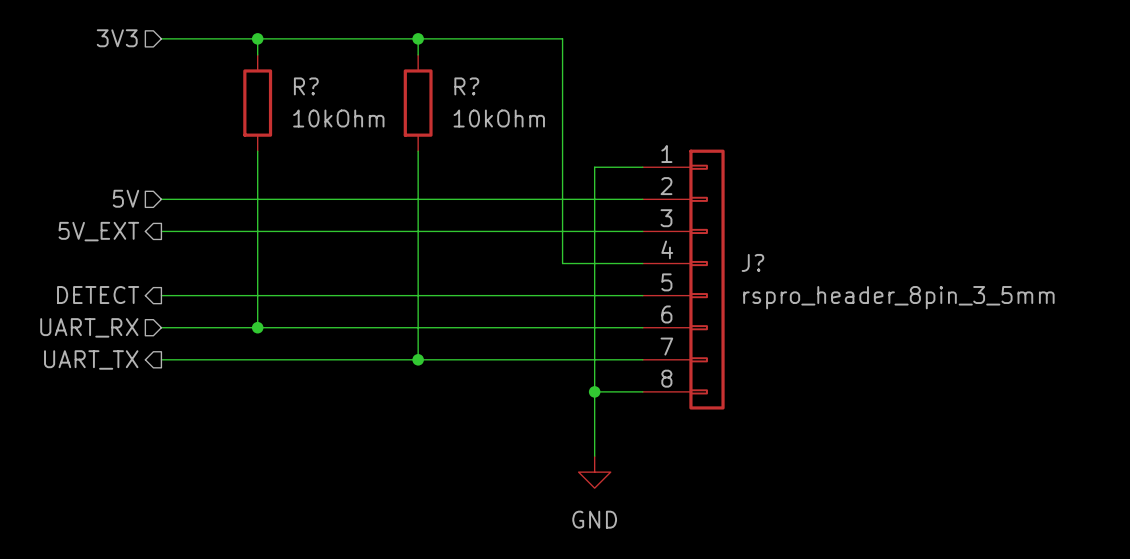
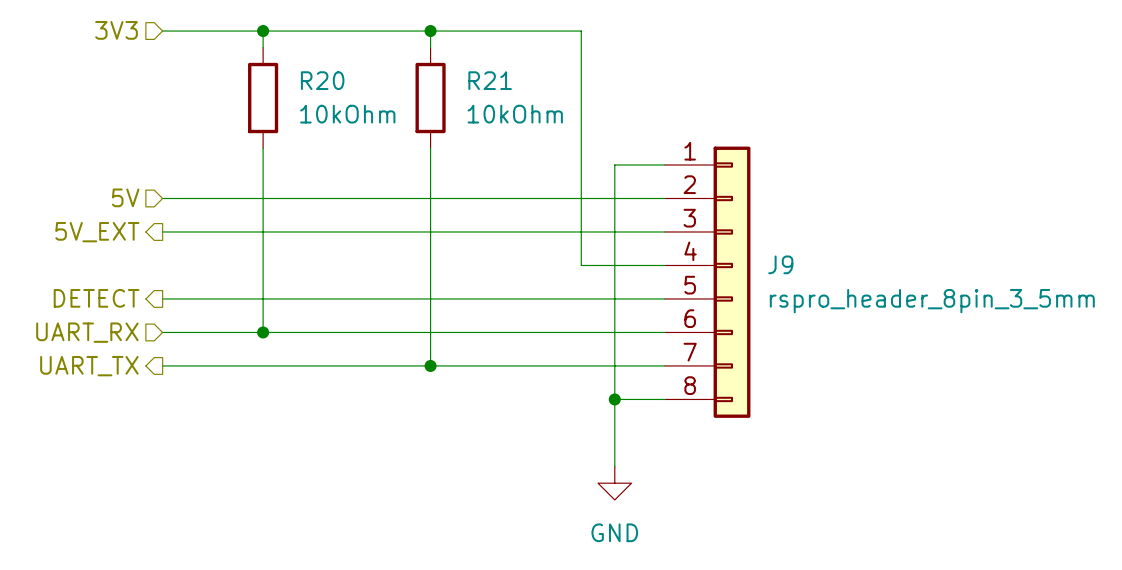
R? name: R? (306, 86) -> R20 (322, 80)
R? name: R? (466, 86) -> R21 (490, 80)
J? name: J? (752, 262) -> J9 (780, 264)

